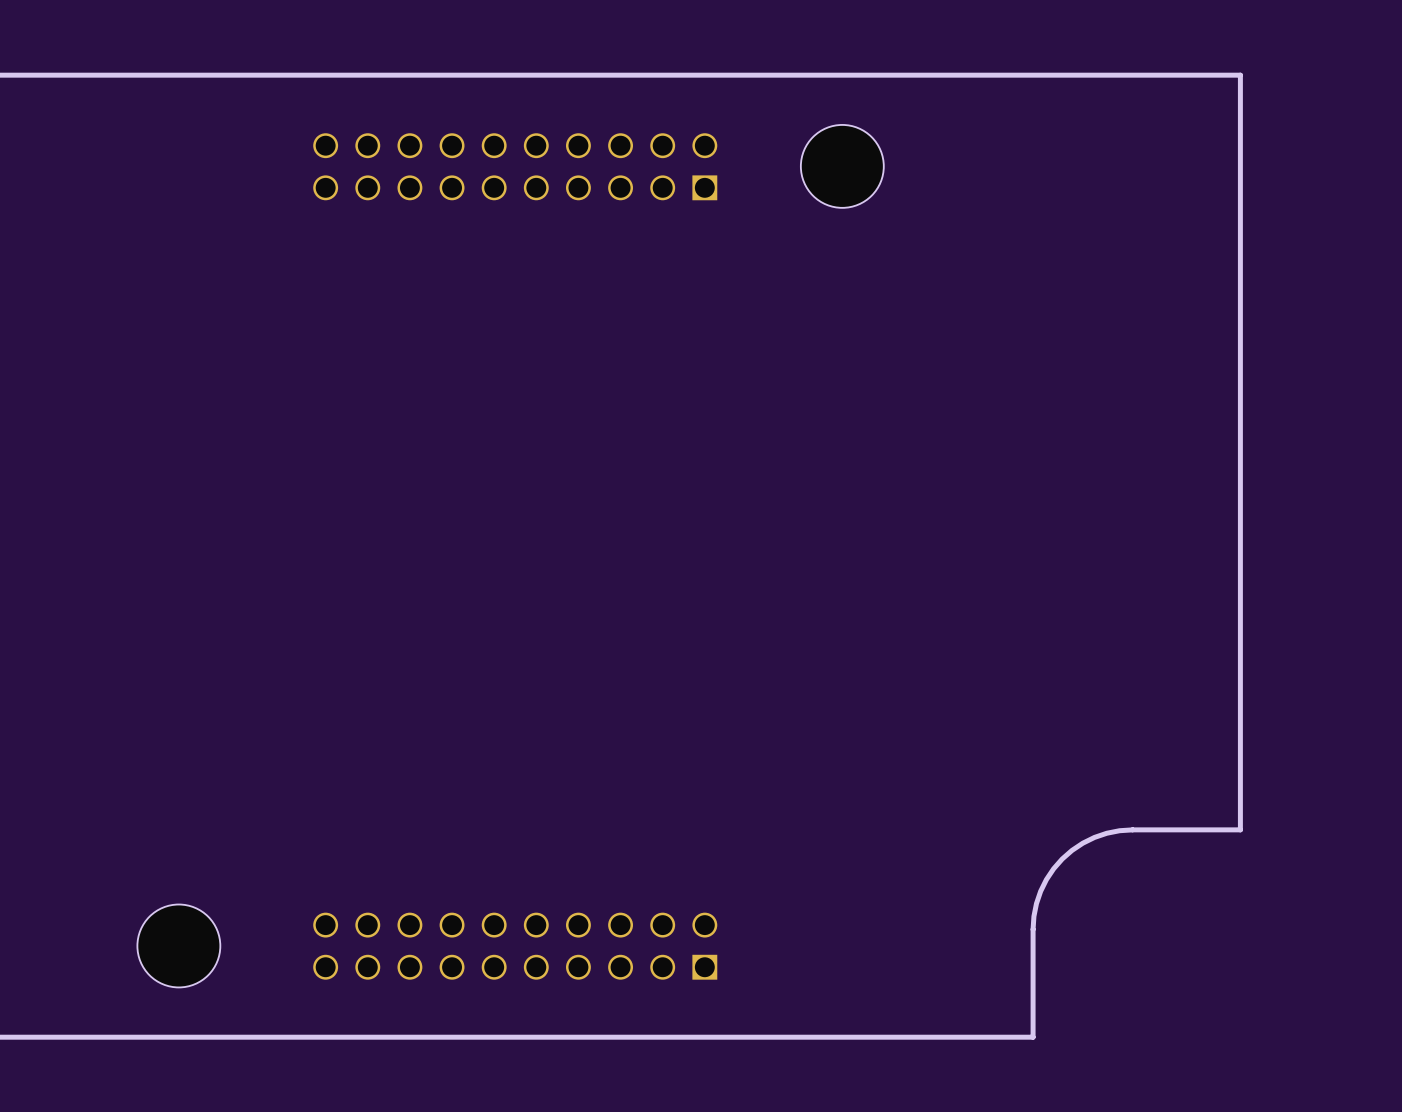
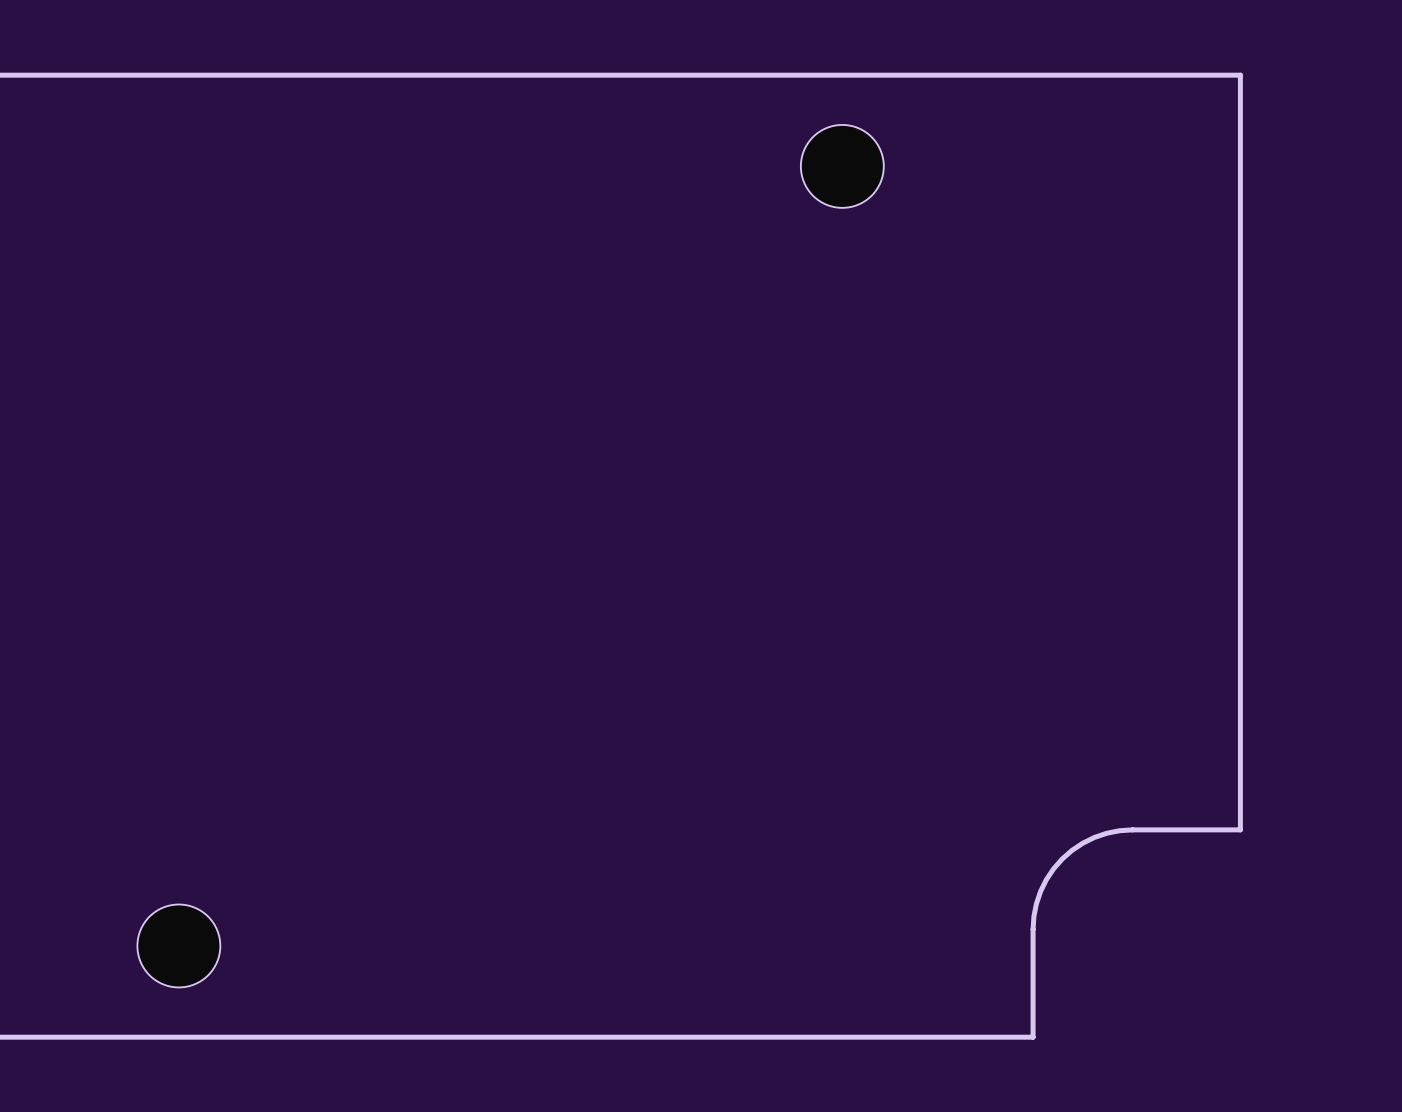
part: (515, 166) -> none
part: (515, 946) -> none

